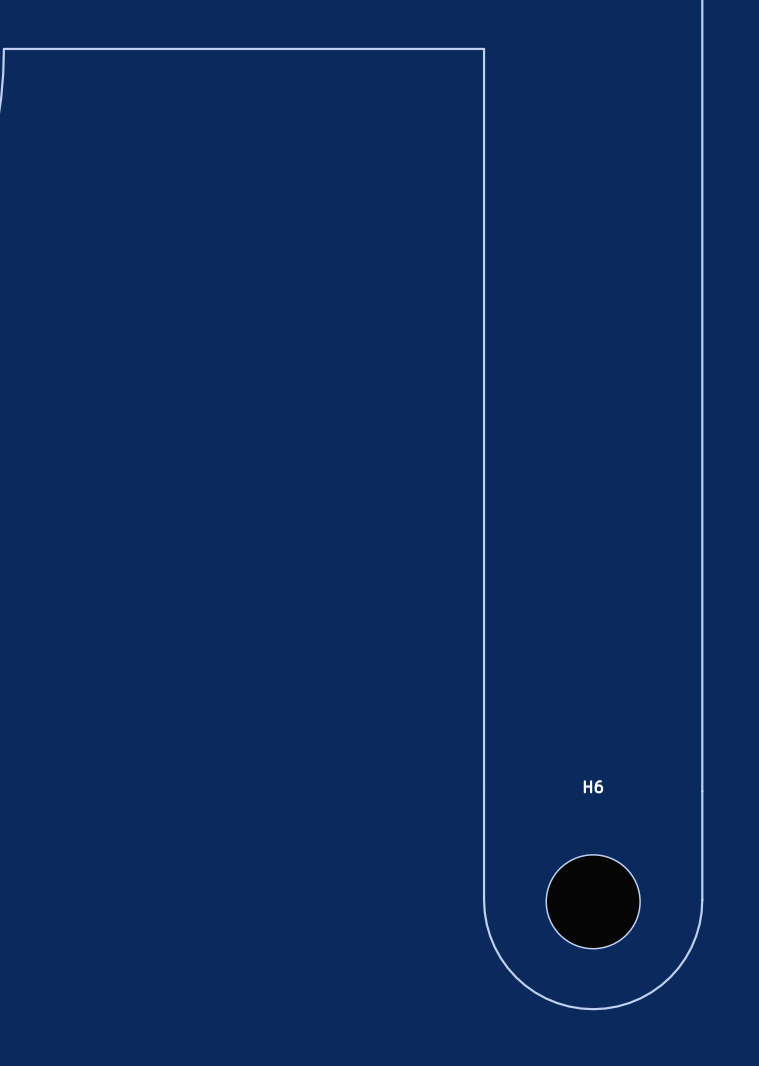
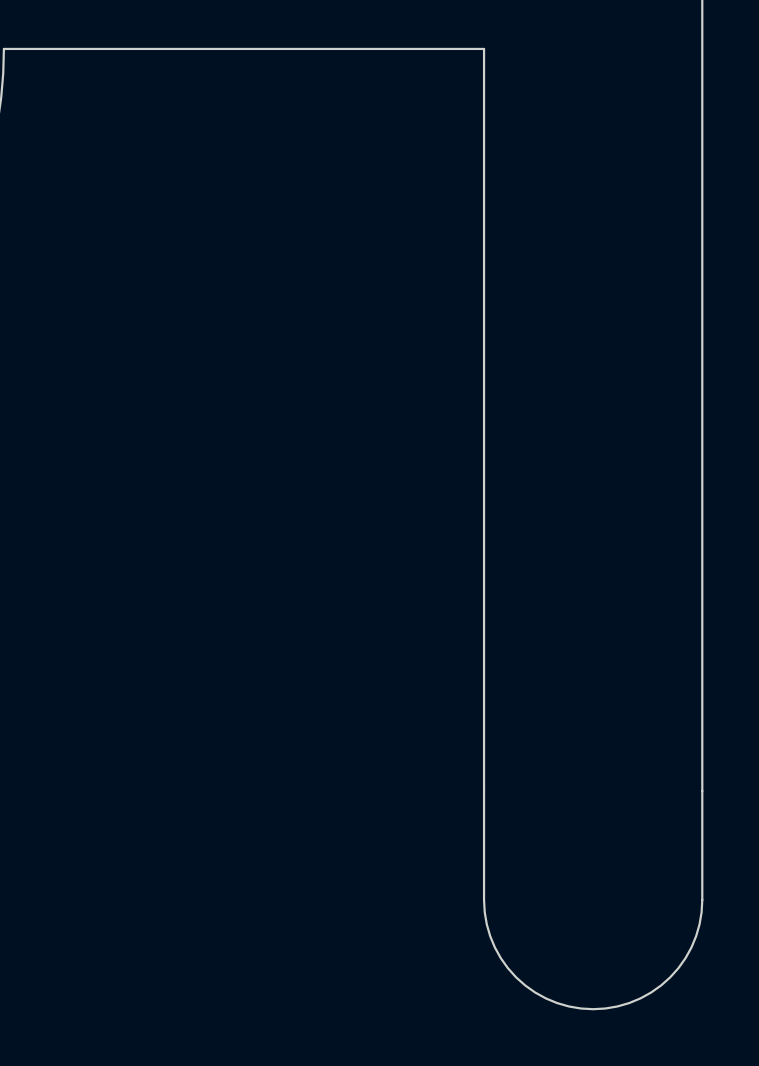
H6: (593, 901) -> none

